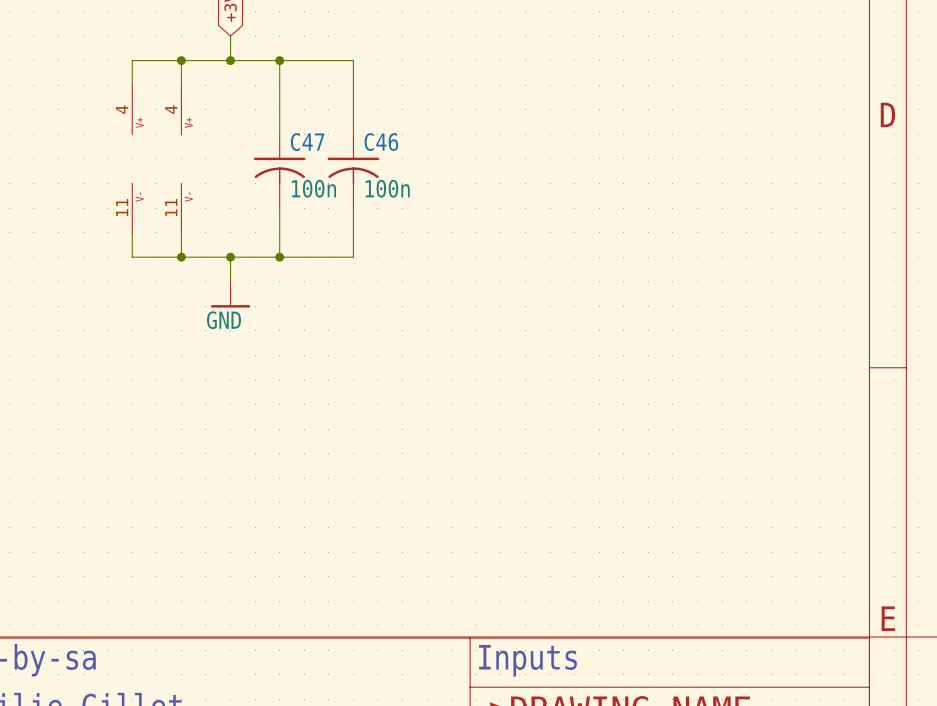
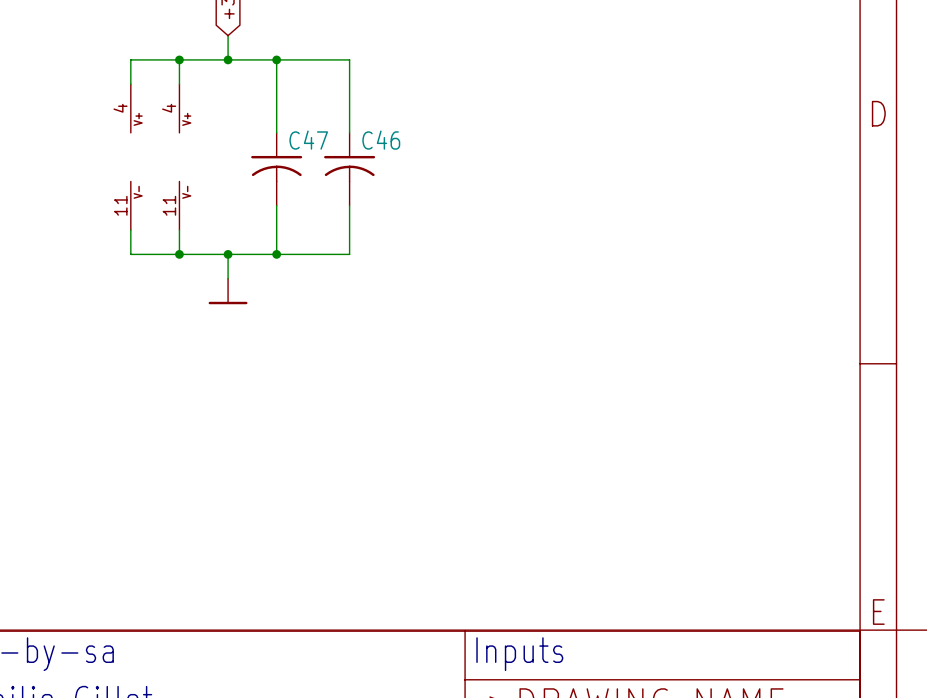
C47 value: 100n (313, 188) -> none
C46 value: 100n (387, 188) -> none
power symbol text: GND (223, 320) -> none

